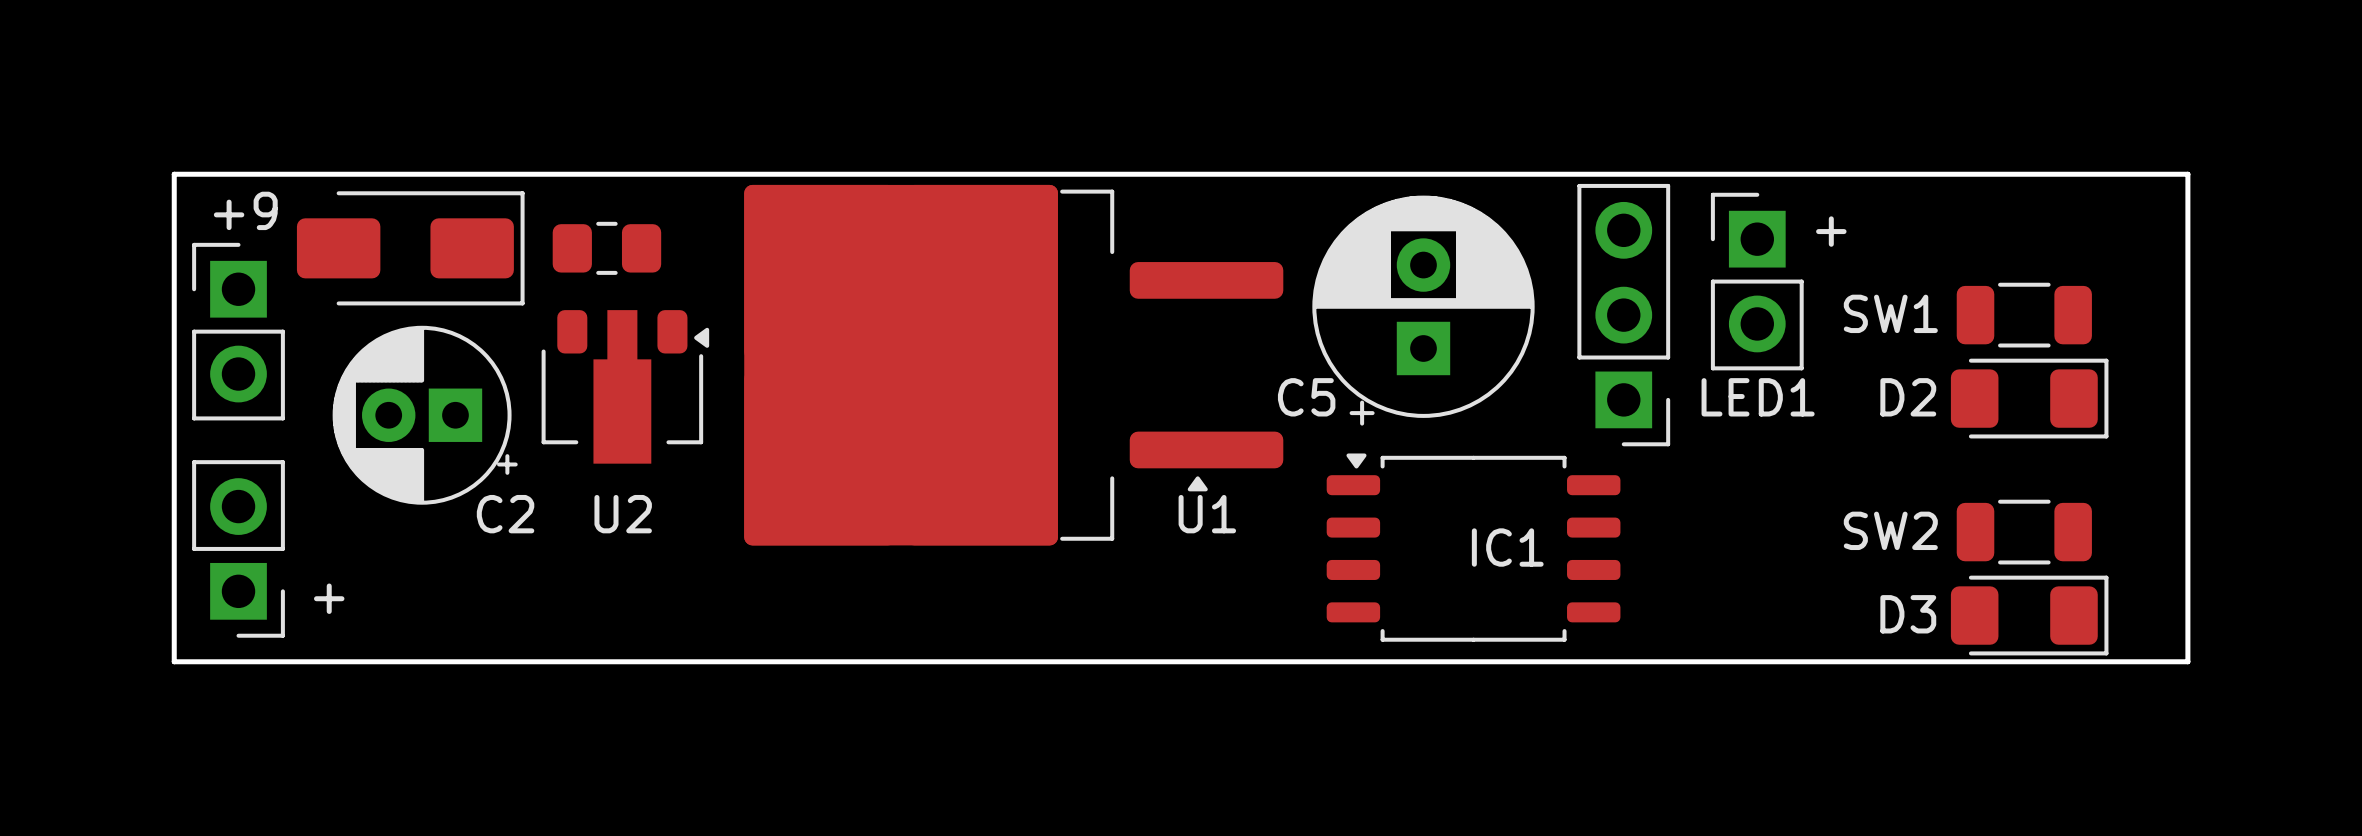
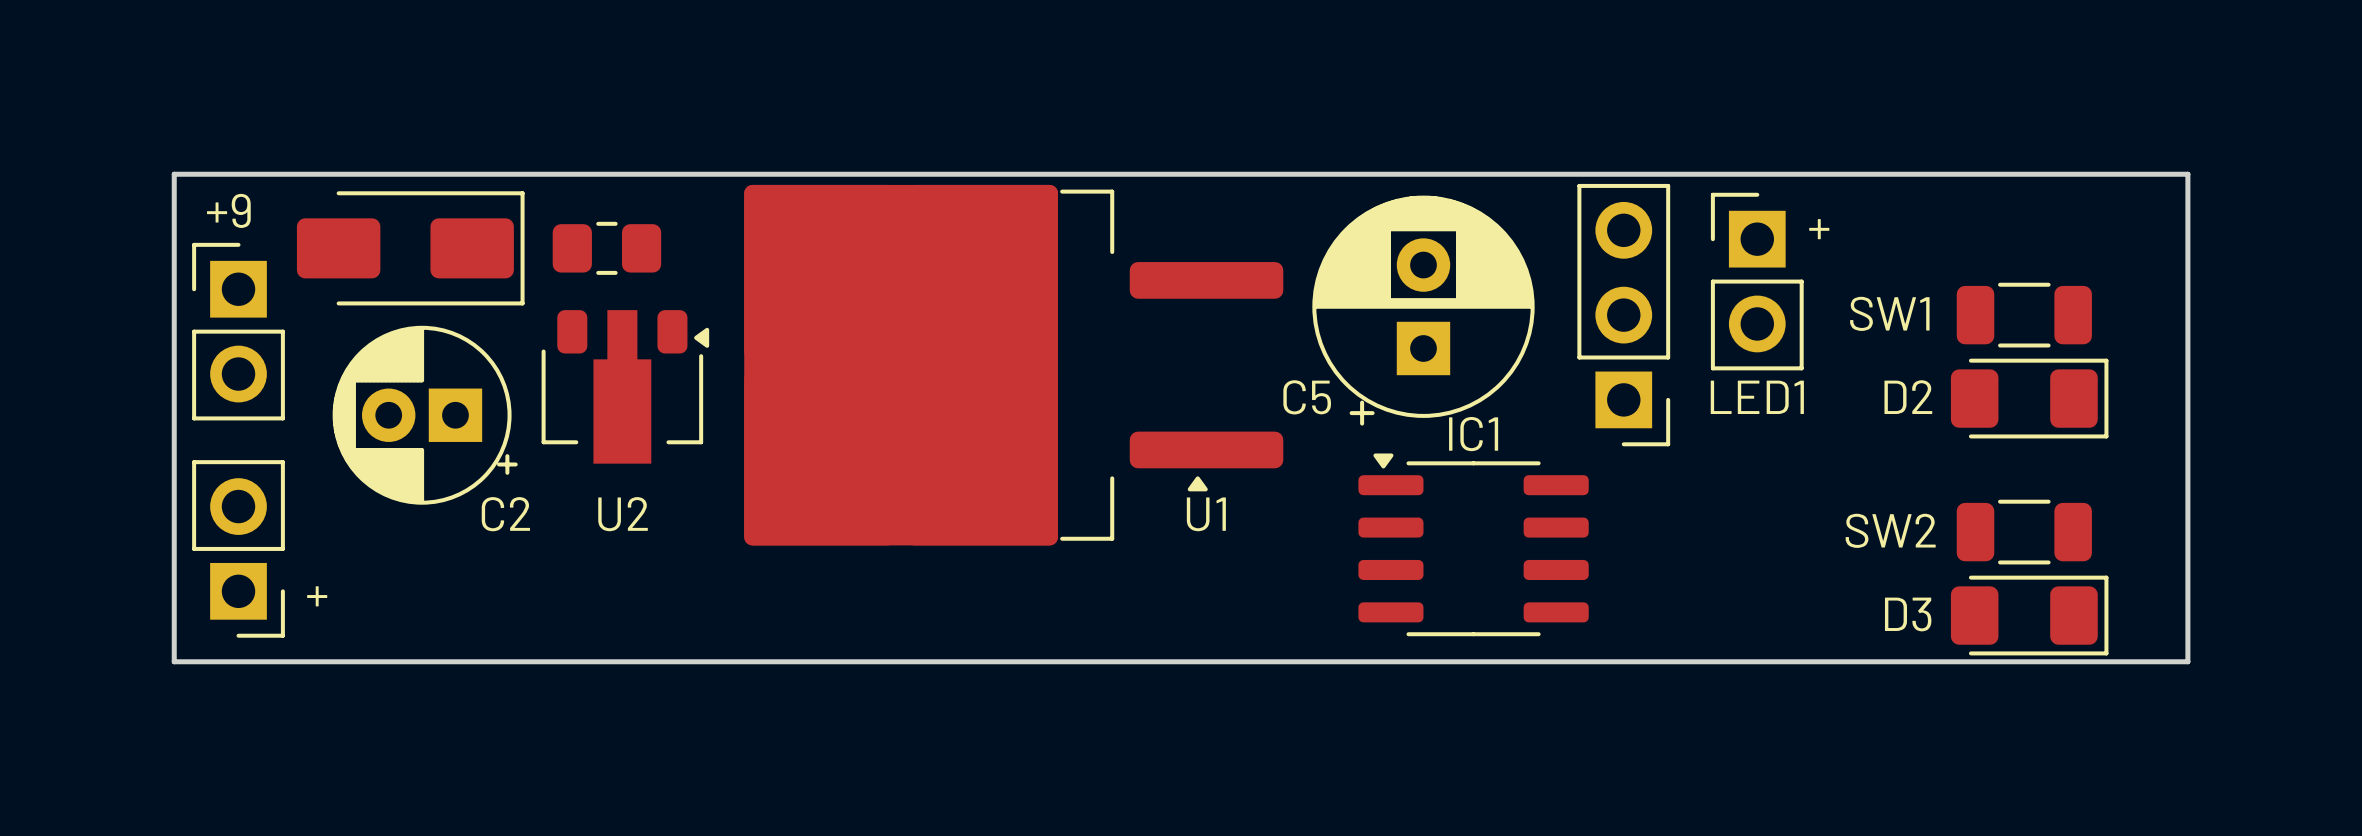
IC1 footprint: [1326, 453, 1621, 642] -> [1358, 453, 1589, 637]
IC1 name position: IC1 (1507, 547) -> IC1 (1473, 434)

